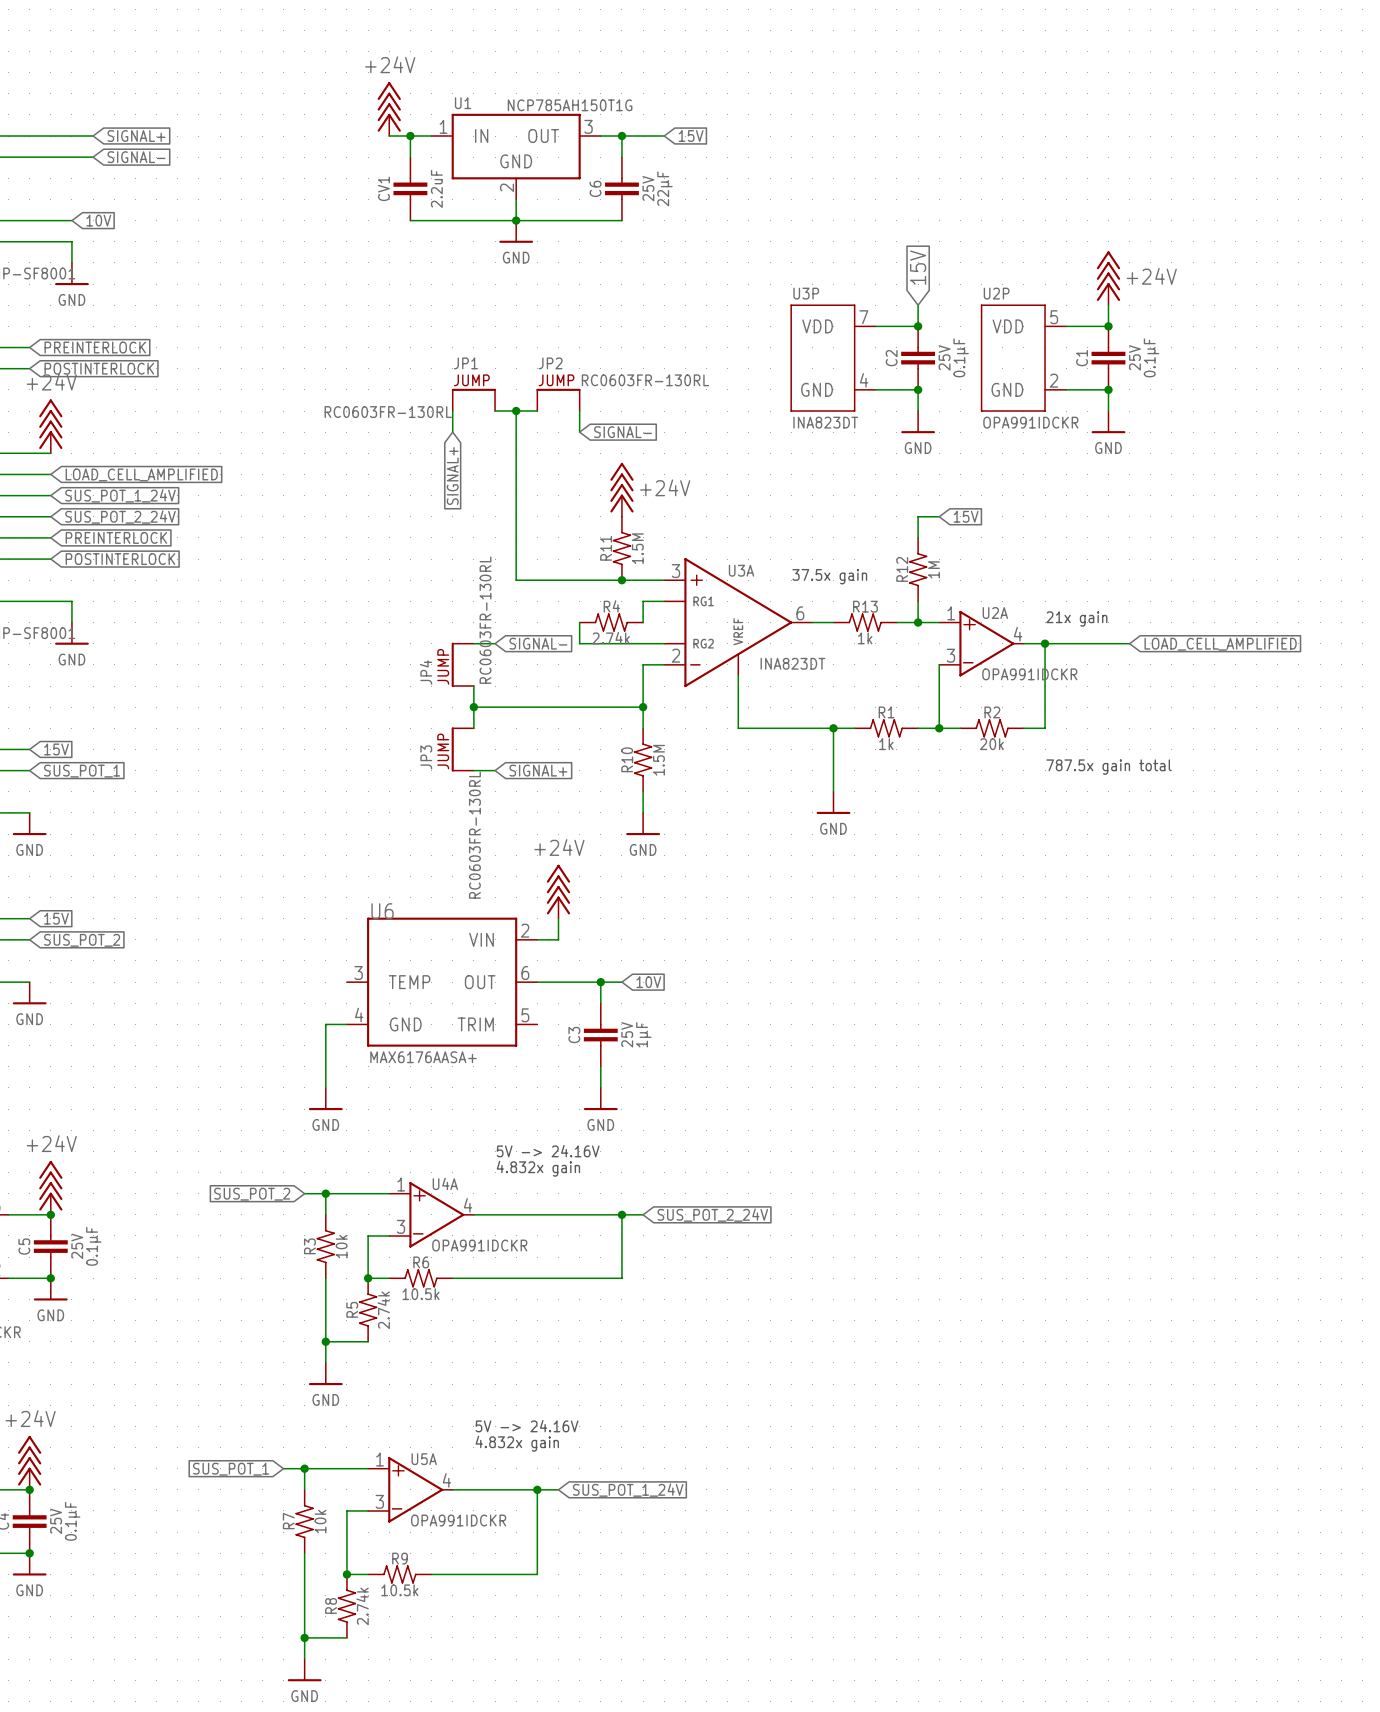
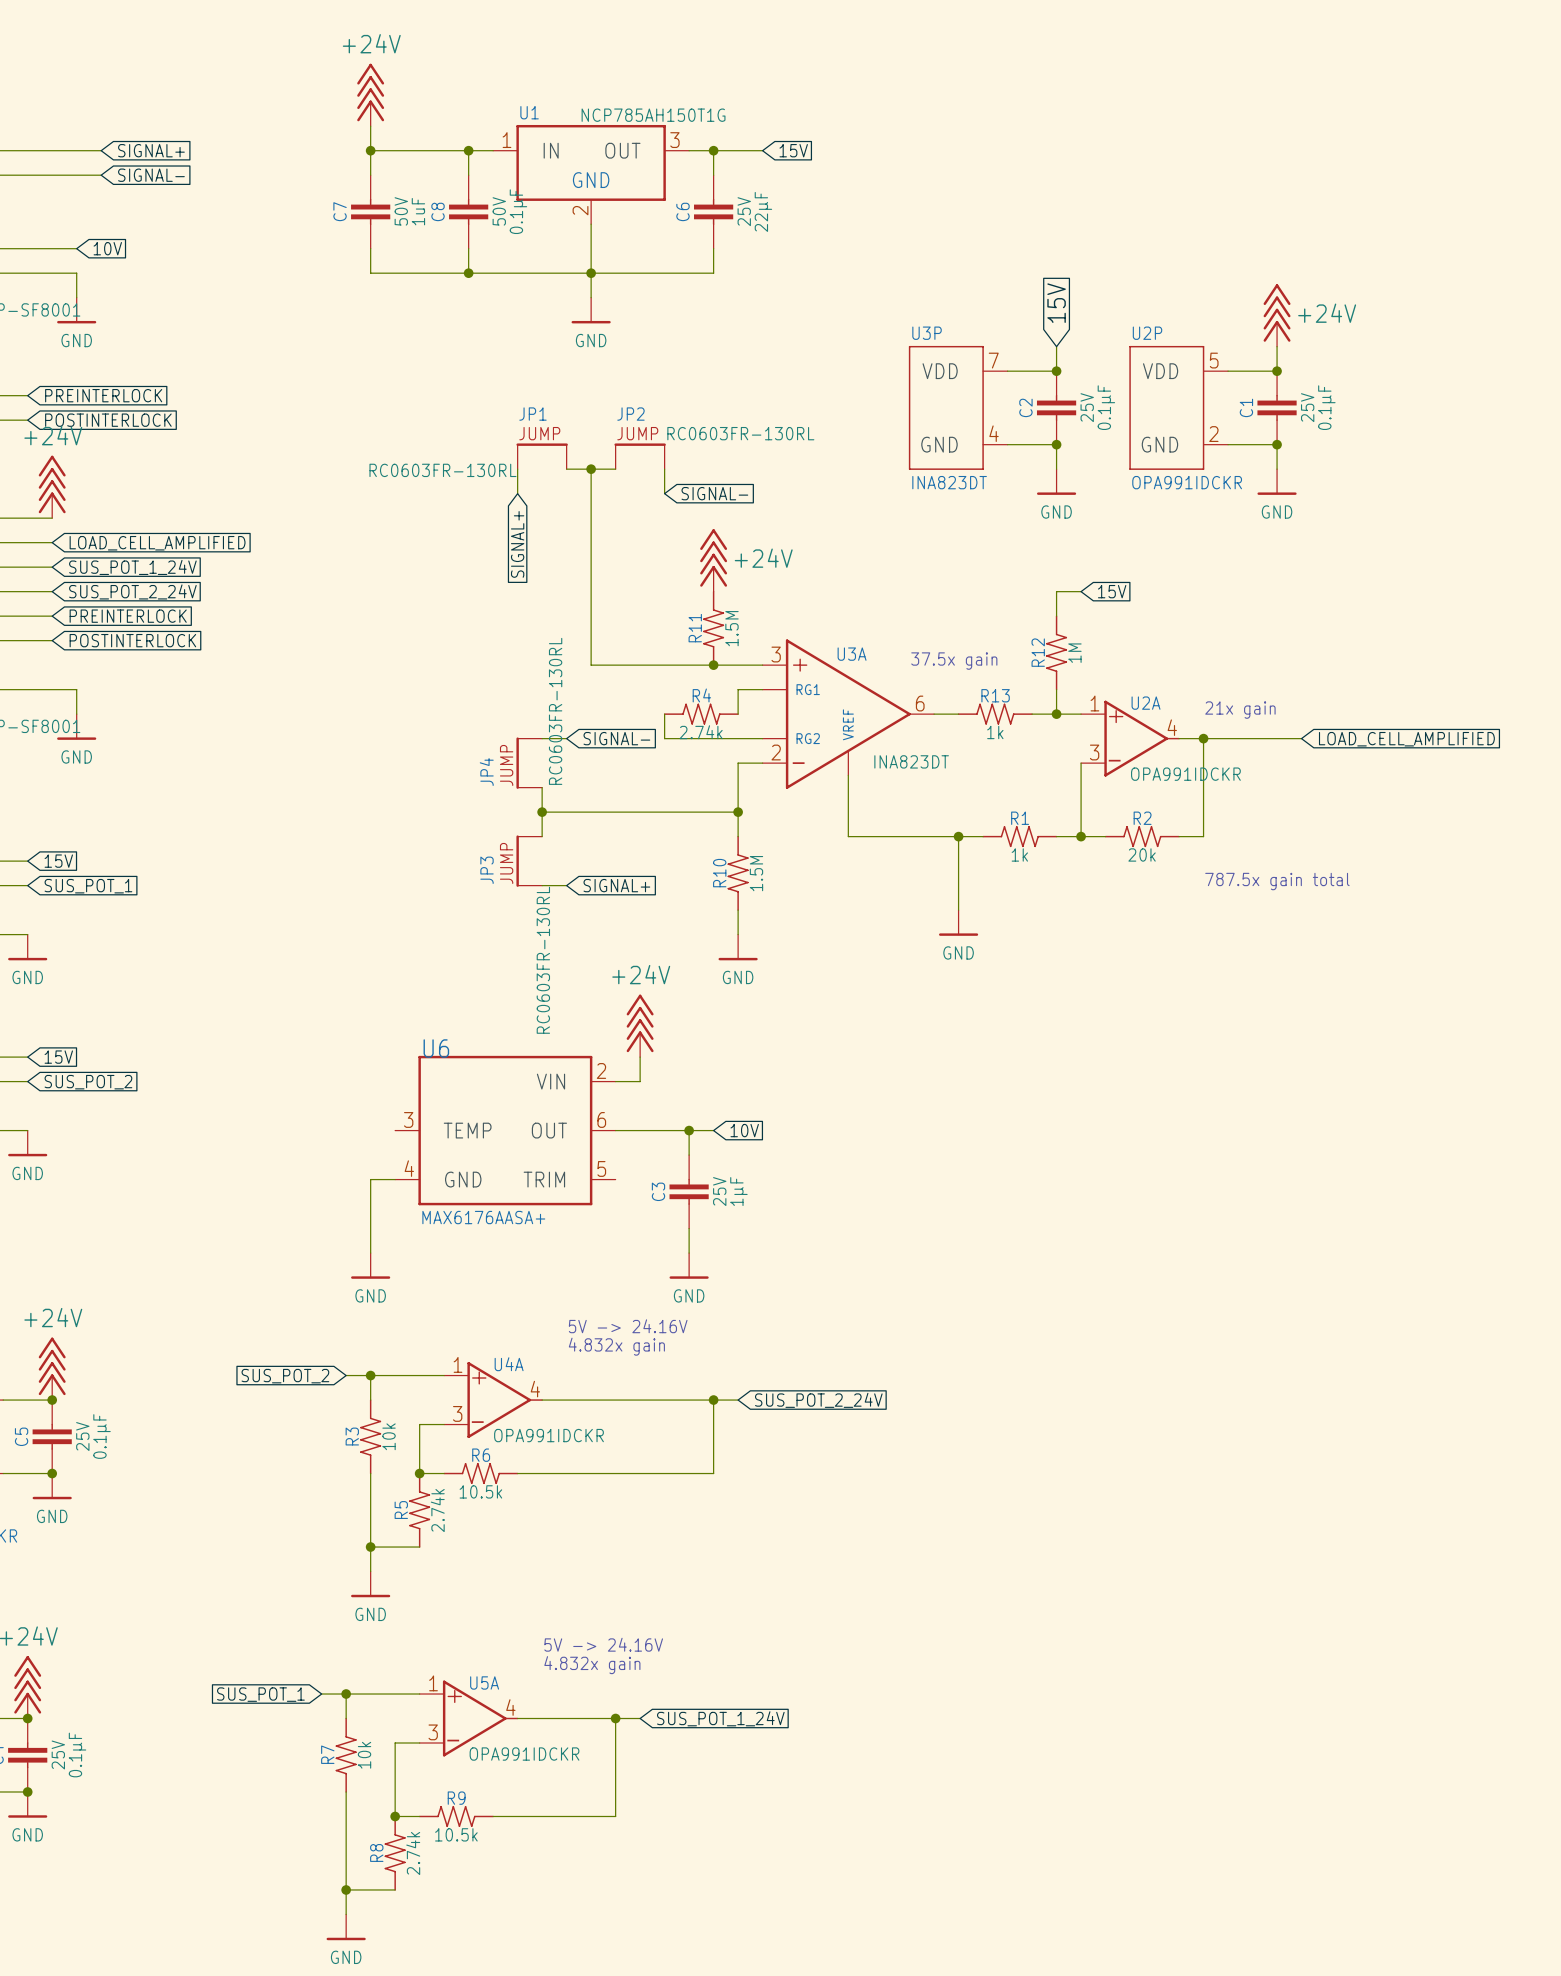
power symbol position: +24V (389, 109) -> +24V (370, 94)
wire: none -> (370, 126) (370, 175)
wire: none -> (370, 150) (444, 150)
junction: none -> (370, 150)
C7: none -> (370, 211)
CV1 name: CV1 (383, 188) -> C8 (438, 211)
CV1 text: none -> 50V (499, 211)
CV1 value: 2.2uF (436, 188) -> none
CV1 text: none -> 0.1µF (518, 211)
wire: (410, 220) (621, 220) -> (370, 248) (370, 273) (713, 273) (713, 248)
wire: none -> (468, 248) (468, 273)
junction position: (516, 220) -> (591, 273)
power symbol position: GND (516, 231) -> GND (591, 310)
junction: none -> (468, 273)

